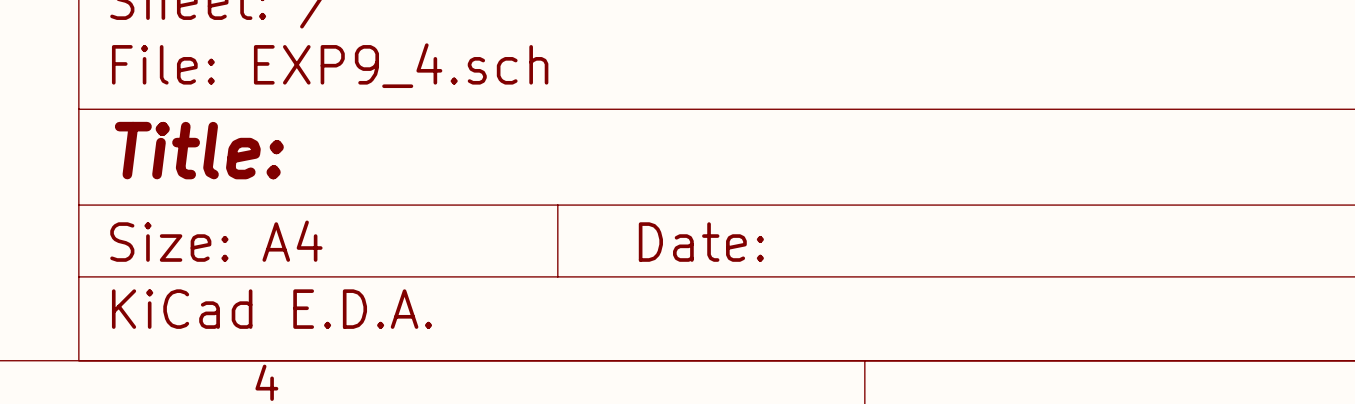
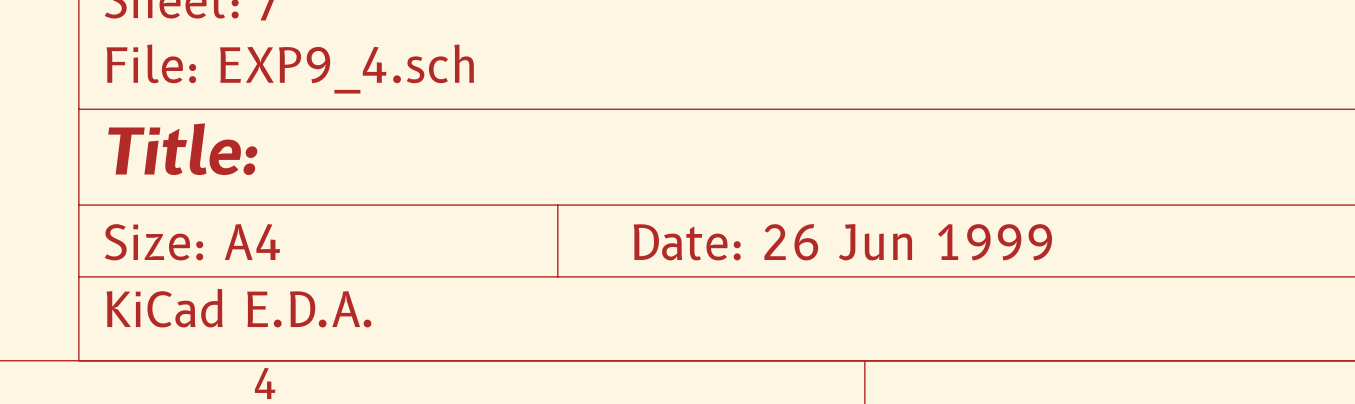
title block: Date: (701, 242) -> Date: 26 Jun 1999 (842, 242)

